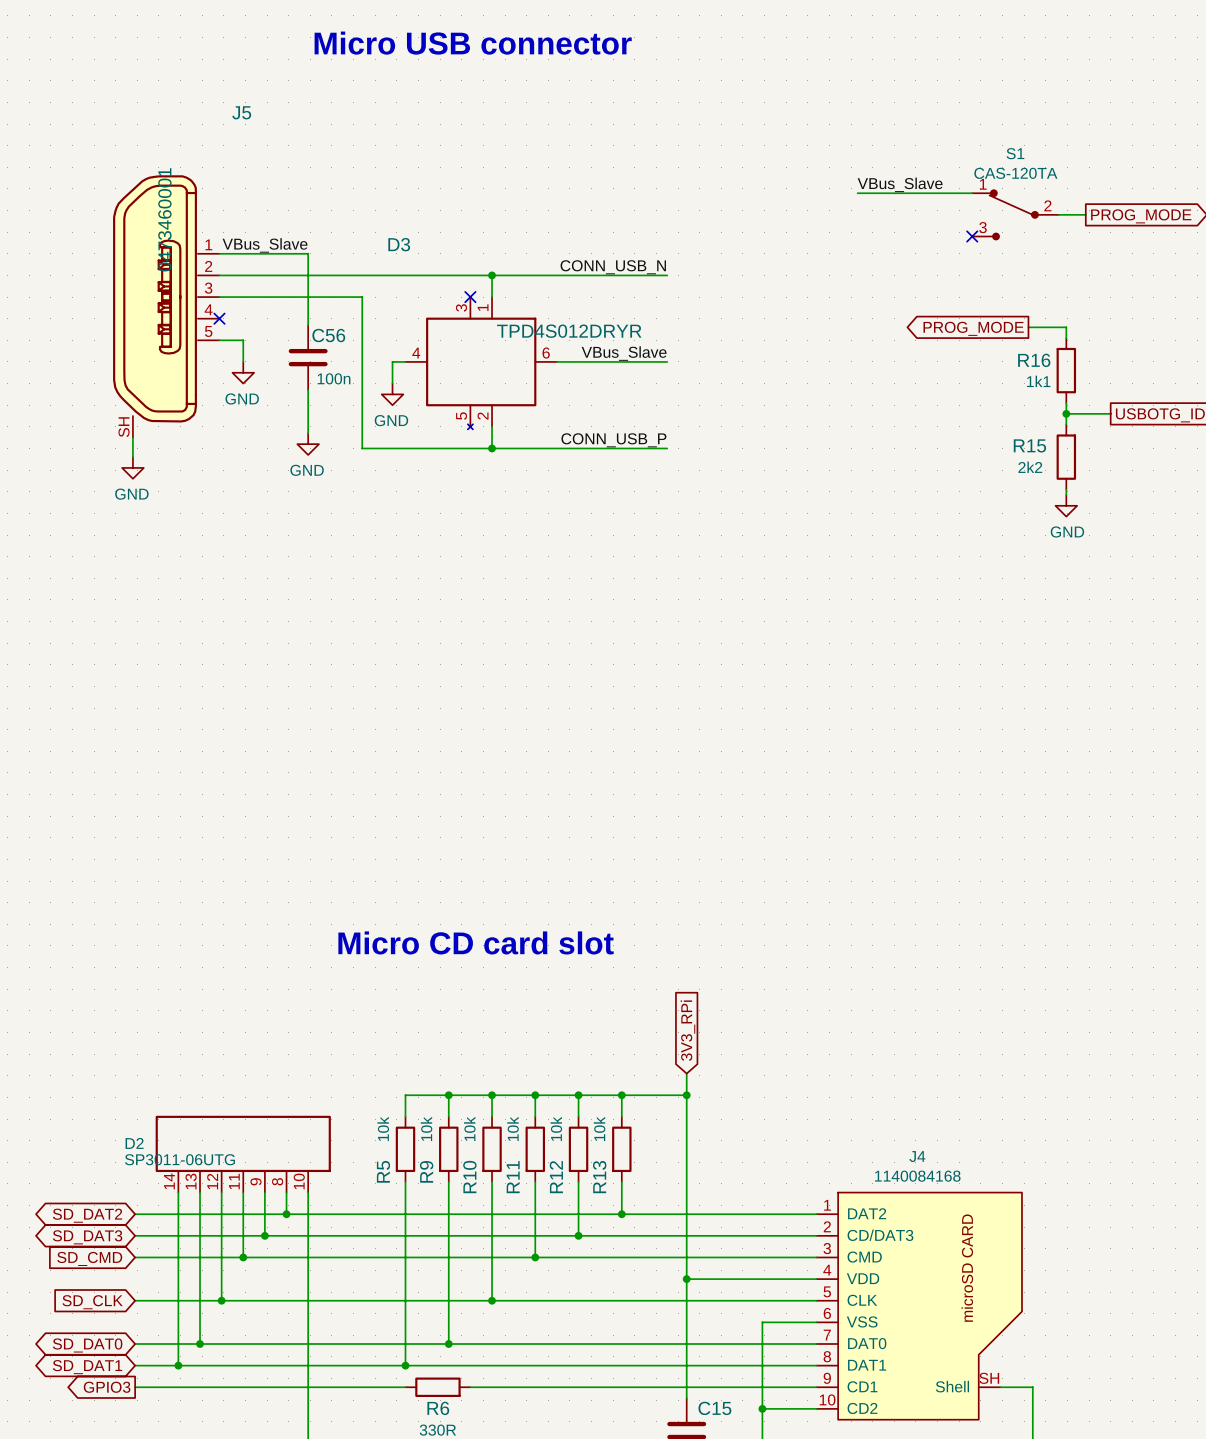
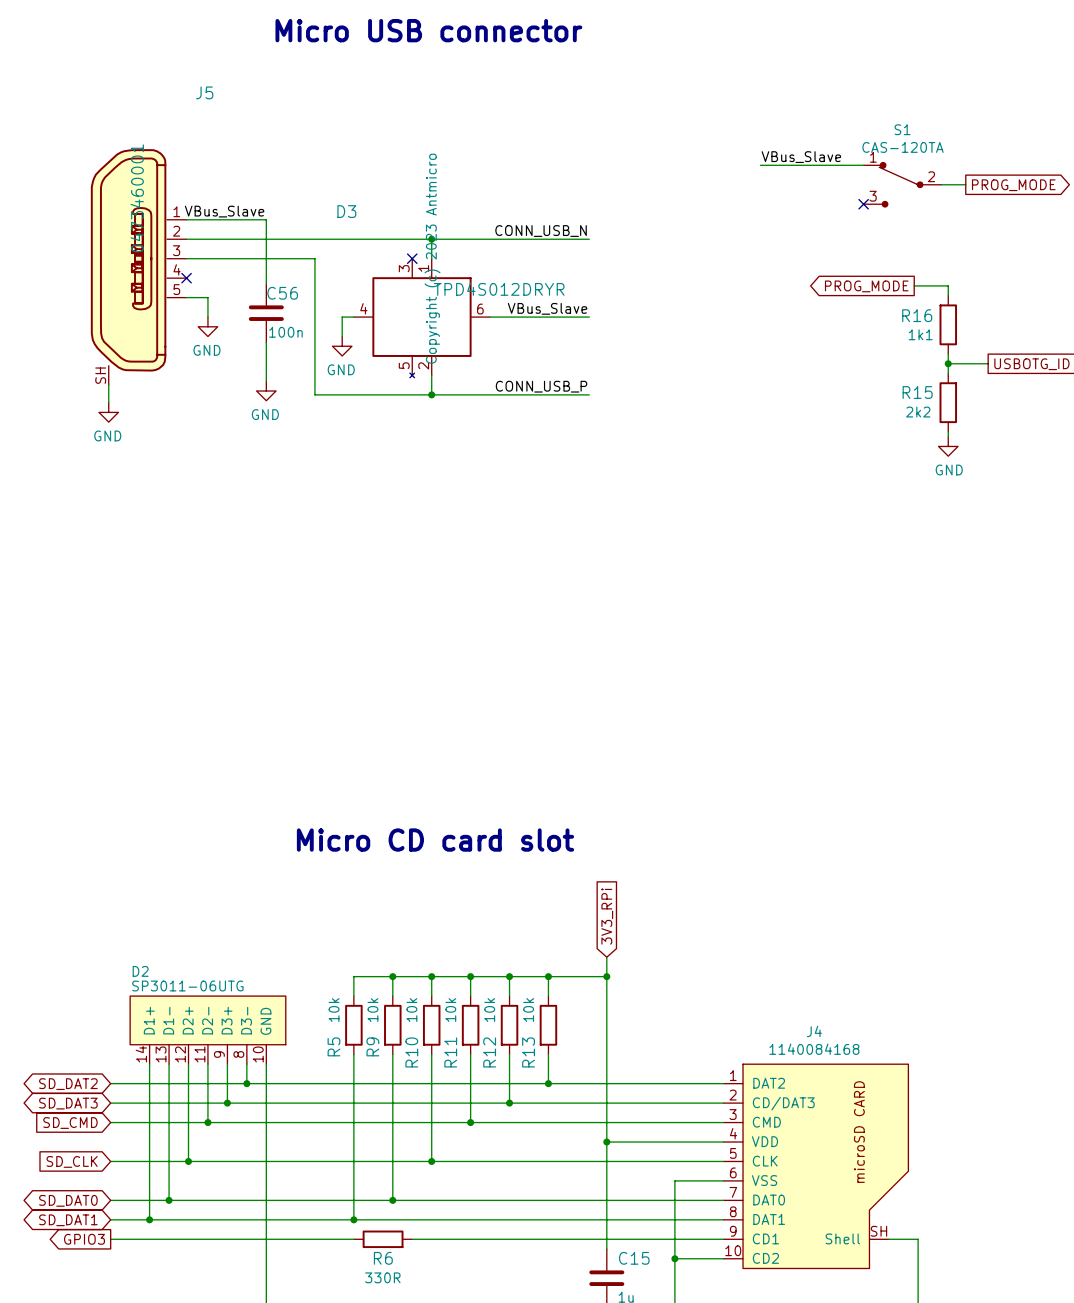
D3 text: none -> Copyright (c) 2023 Antmicro (432, 258)
D2 symbol: [155, 1115, 331, 1193] -> [130, 996, 286, 1065]
D2 name position: D2 (134, 1143) -> D2 (140, 971)
D2 value position: SP3011-06UTG (179, 1159) -> SP3011-06UTG (187, 986)

